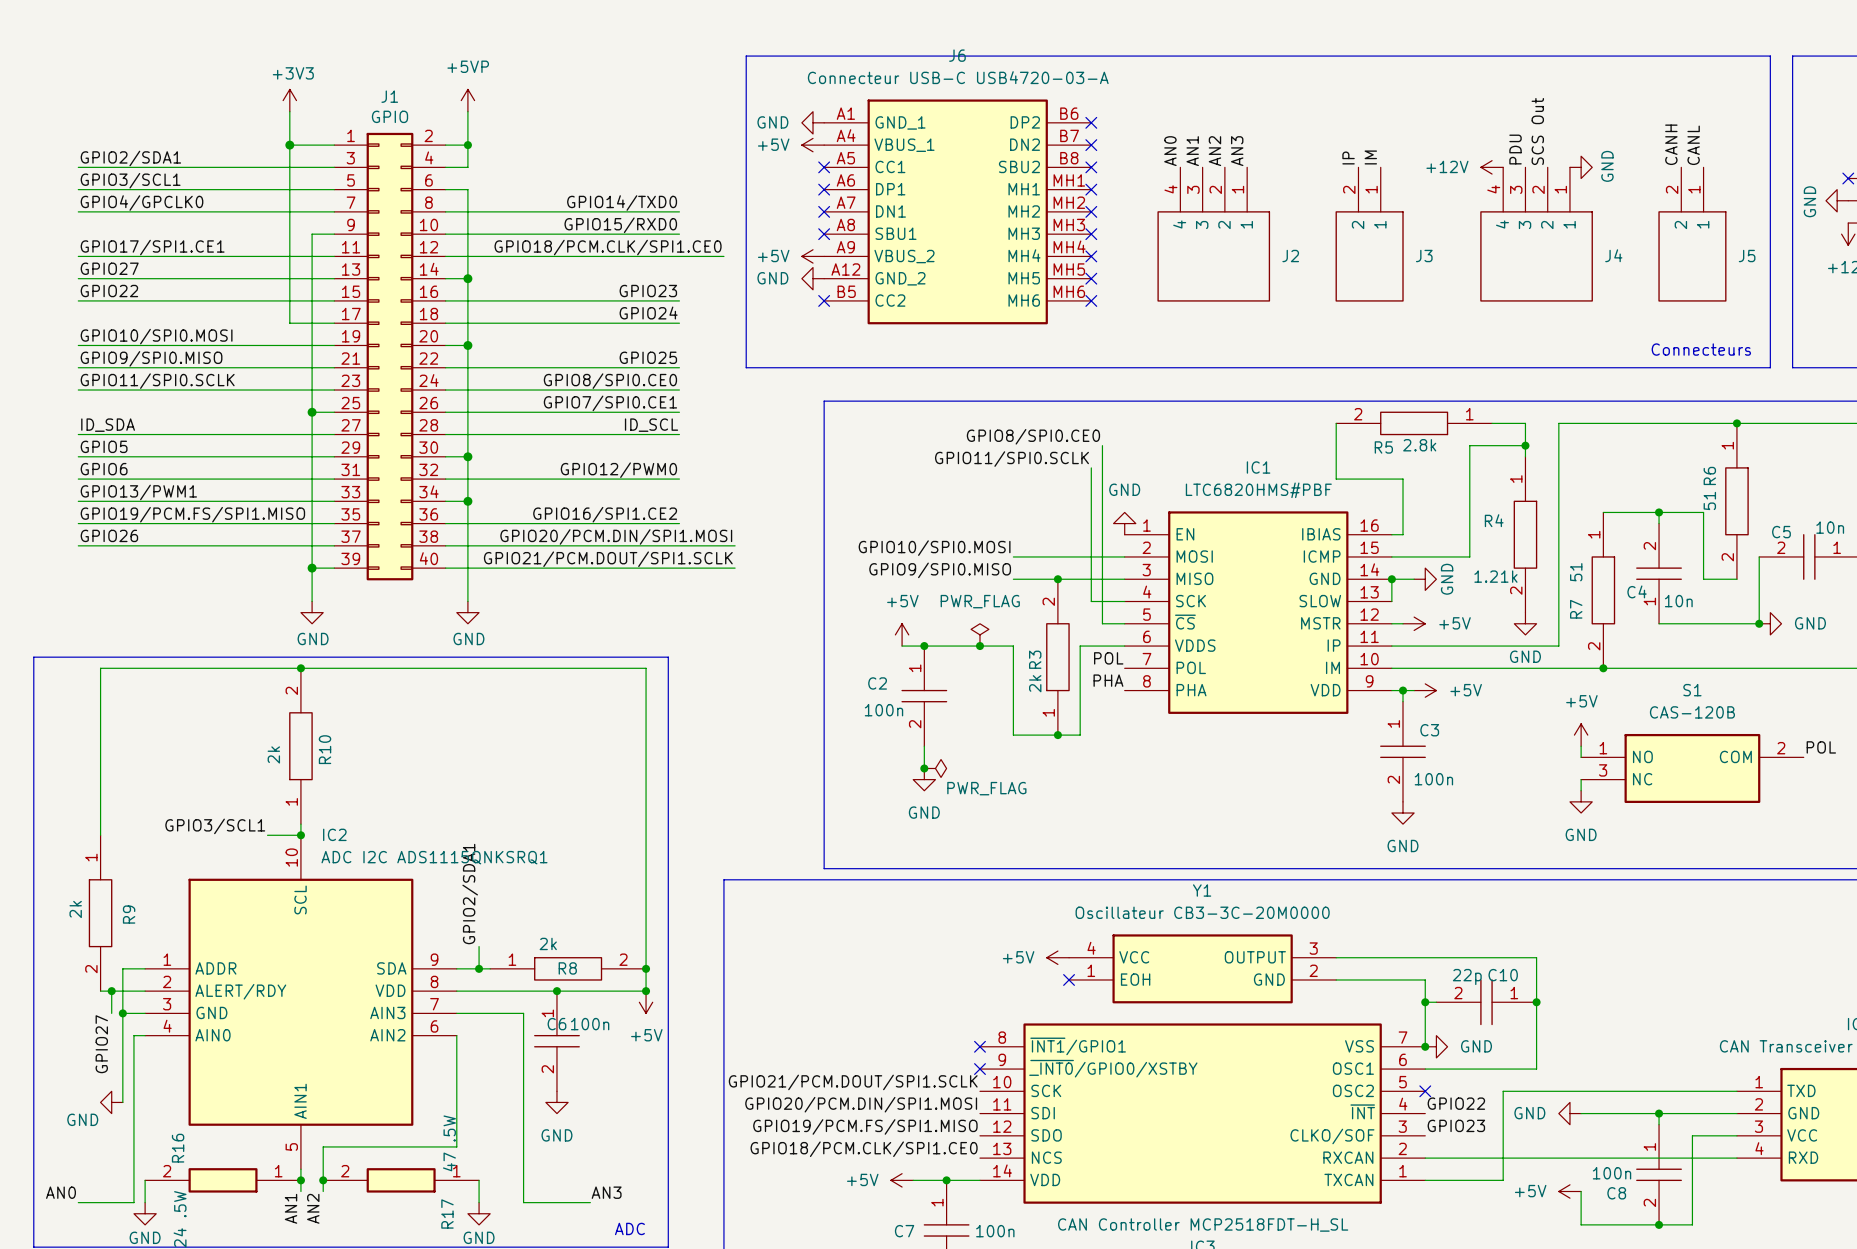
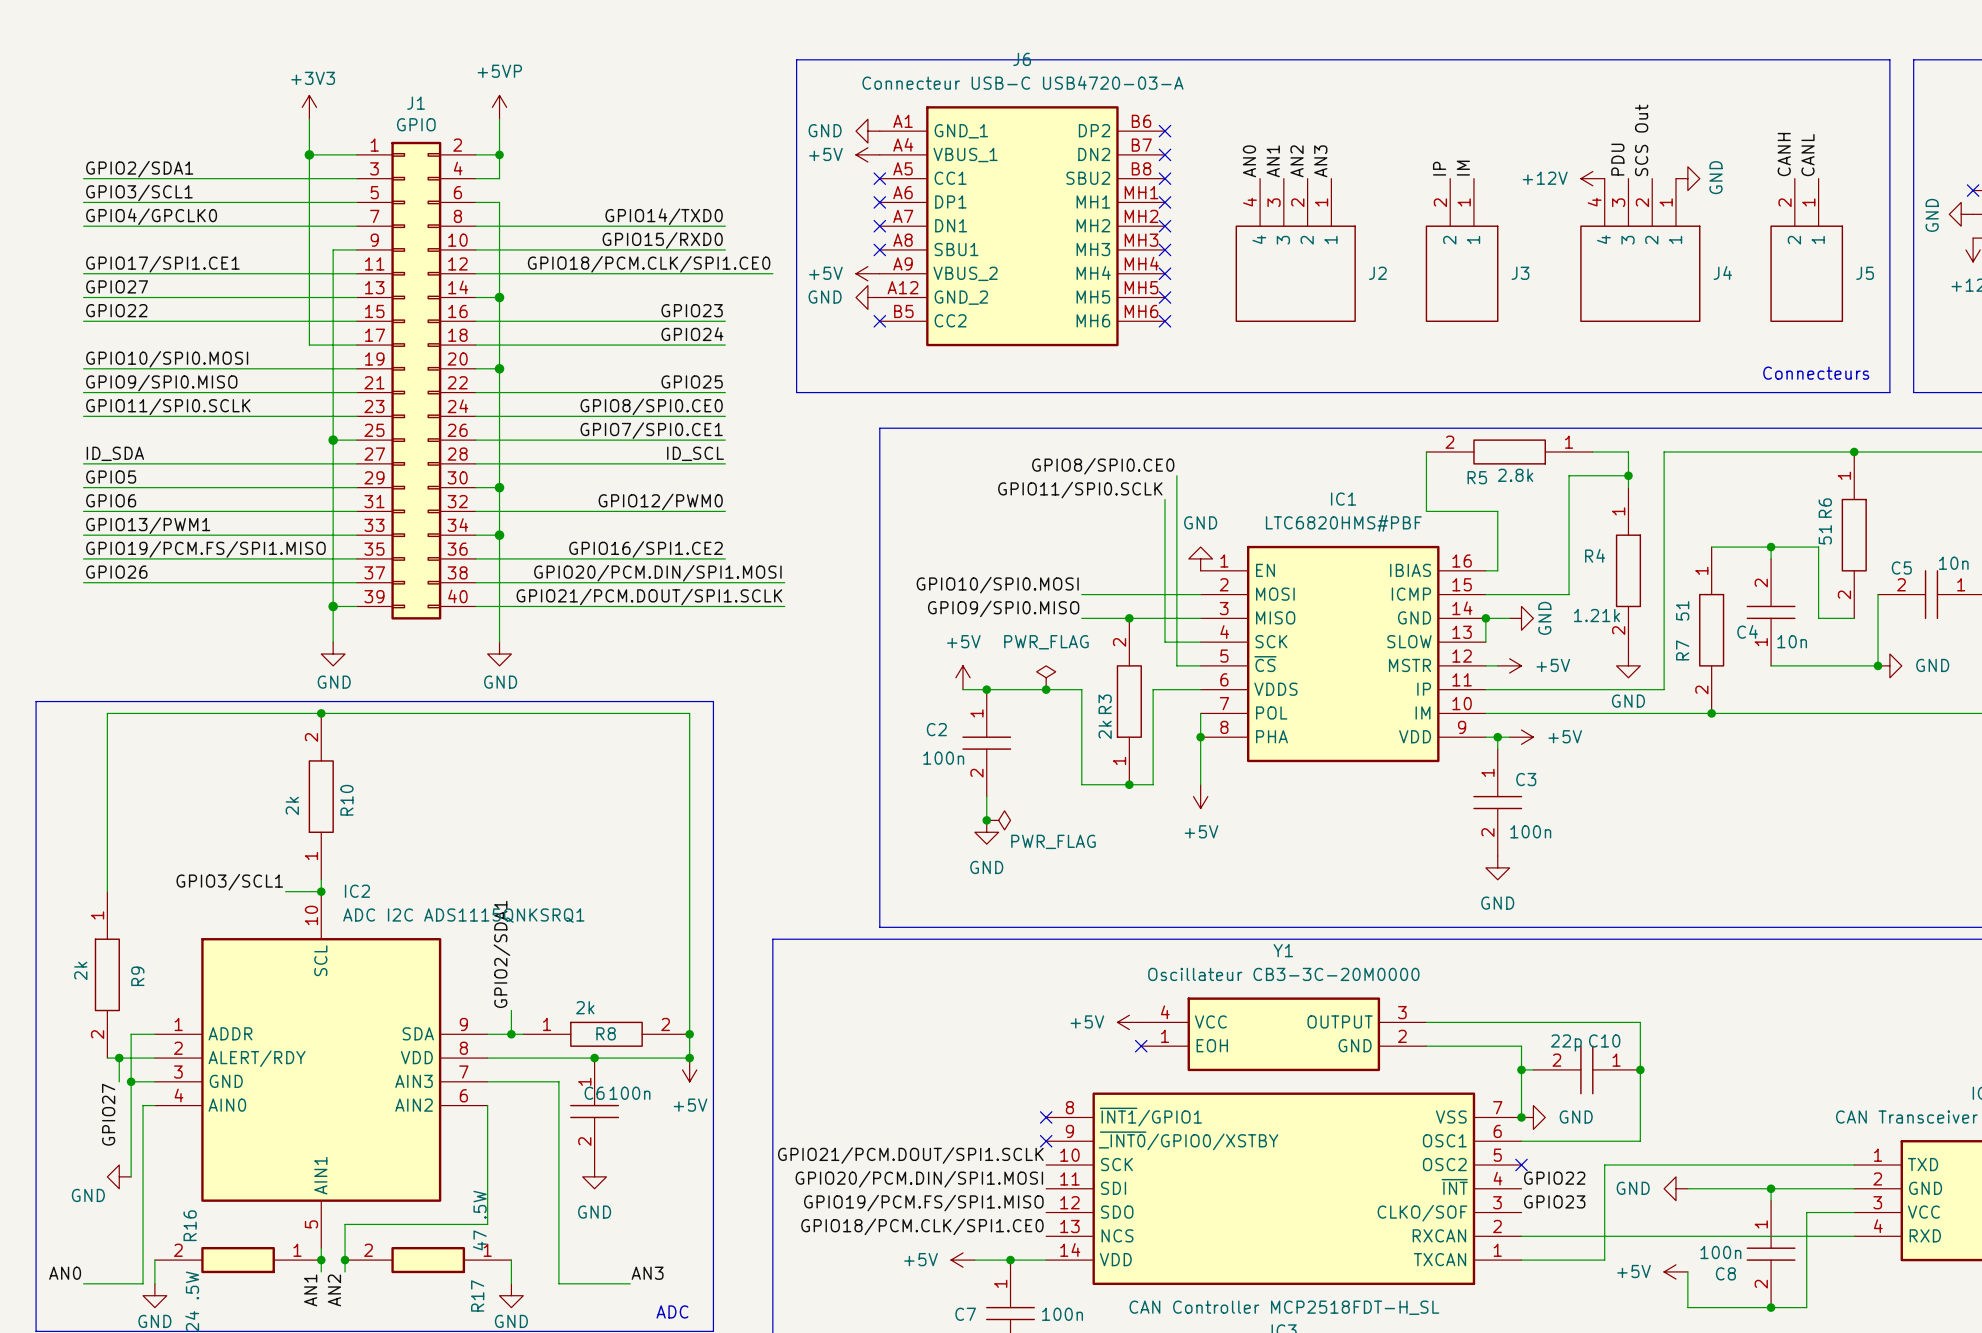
label: POL (1108, 658) -> none
wire: none -> (1200, 713) (1200, 784)
label: PHA (1108, 680) -> none
junction: none -> (1200, 737)
power symbol: +5V (1581, 735) -> none
power symbol: none -> +5V (1200, 796)
wire: (1581, 746) (1581, 757) -> none
label: POL (1821, 747) -> none
S1: CAS-120B (1692, 768) -> none
wire: (1581, 779) (1581, 790) -> none
power symbol: GND (1581, 801) -> none

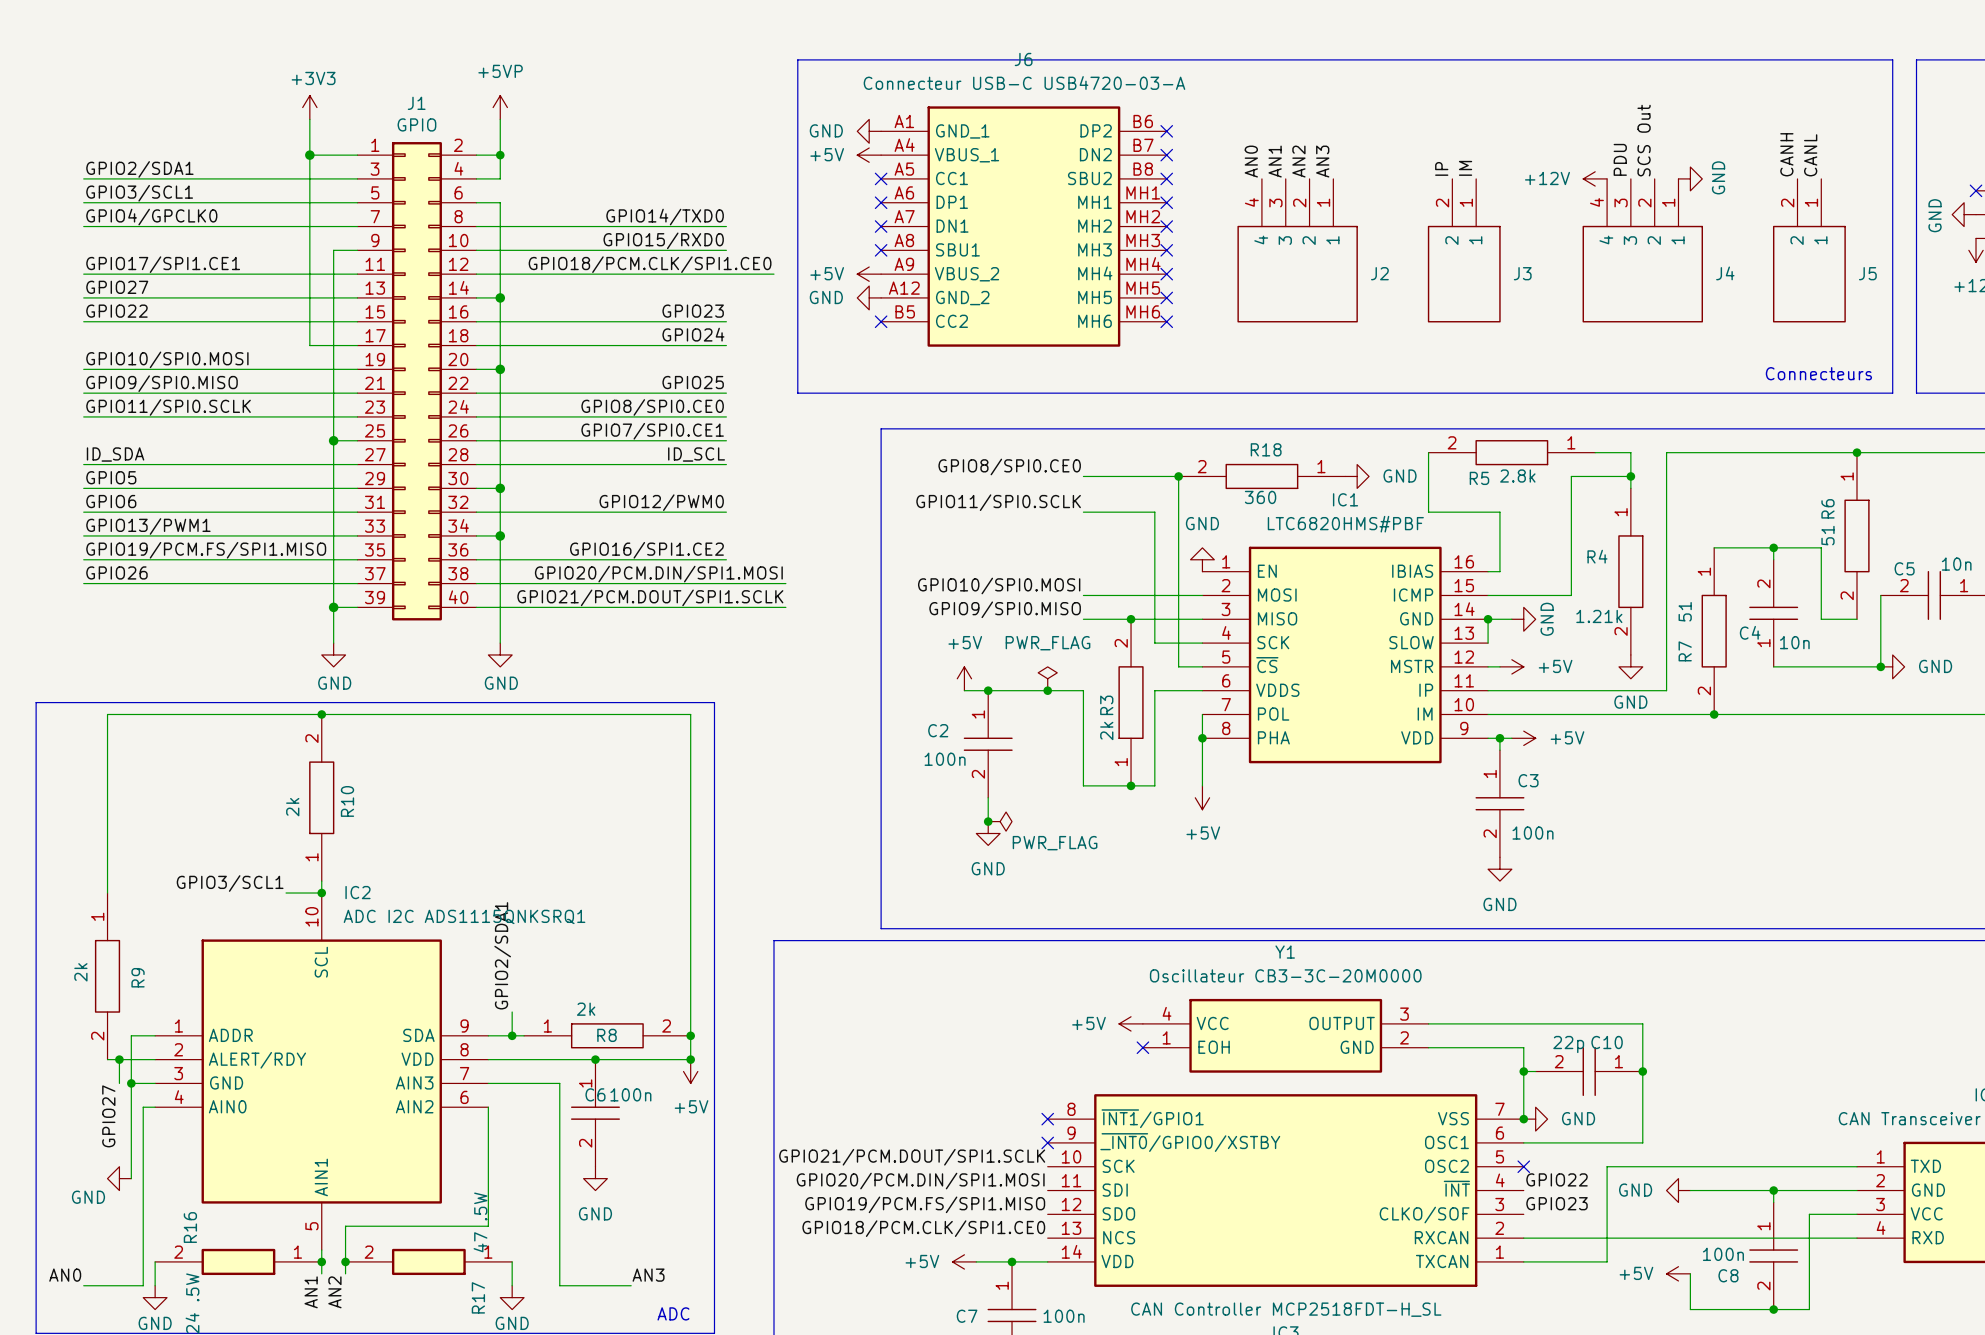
label position: GPIO8/SPI0.CE0 (1103, 466) -> GPIO8/SPI0.CE0 (1009, 466)
wire: none -> (1083, 476) (1178, 476)
junction: none -> (1178, 476)
R18: none -> 360 (1261, 476)
power symbol: none -> GND (1357, 476)
label position: GPIO11/SPI0.SCLK (1080, 490) -> GPIO11/SPI0.SCLK (998, 502)
wire: (1165, 499) (1165, 642) -> (1083, 512) (1154, 512) (1154, 643) (1166, 643)

